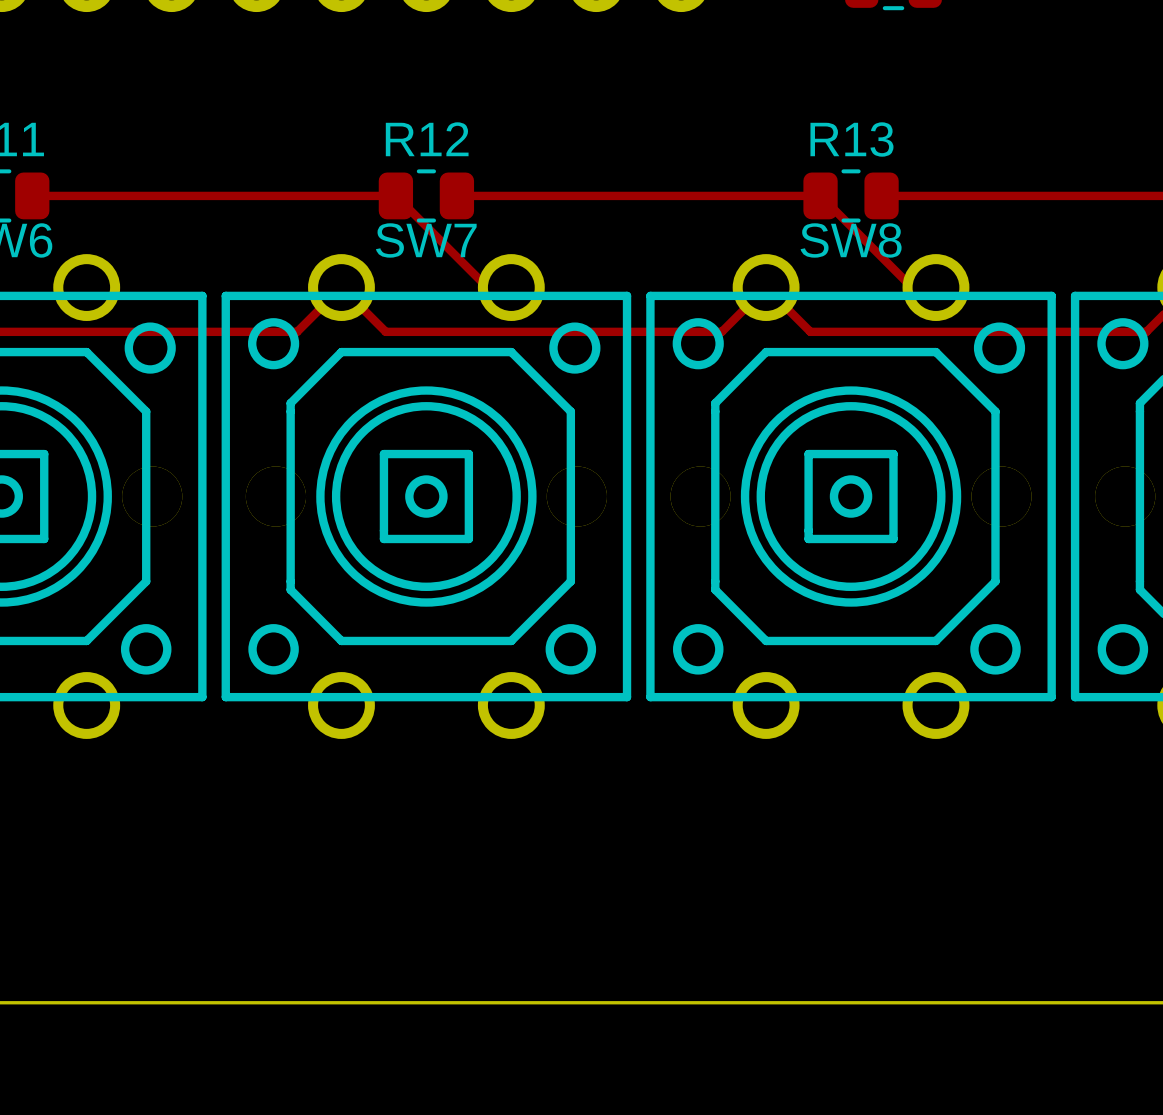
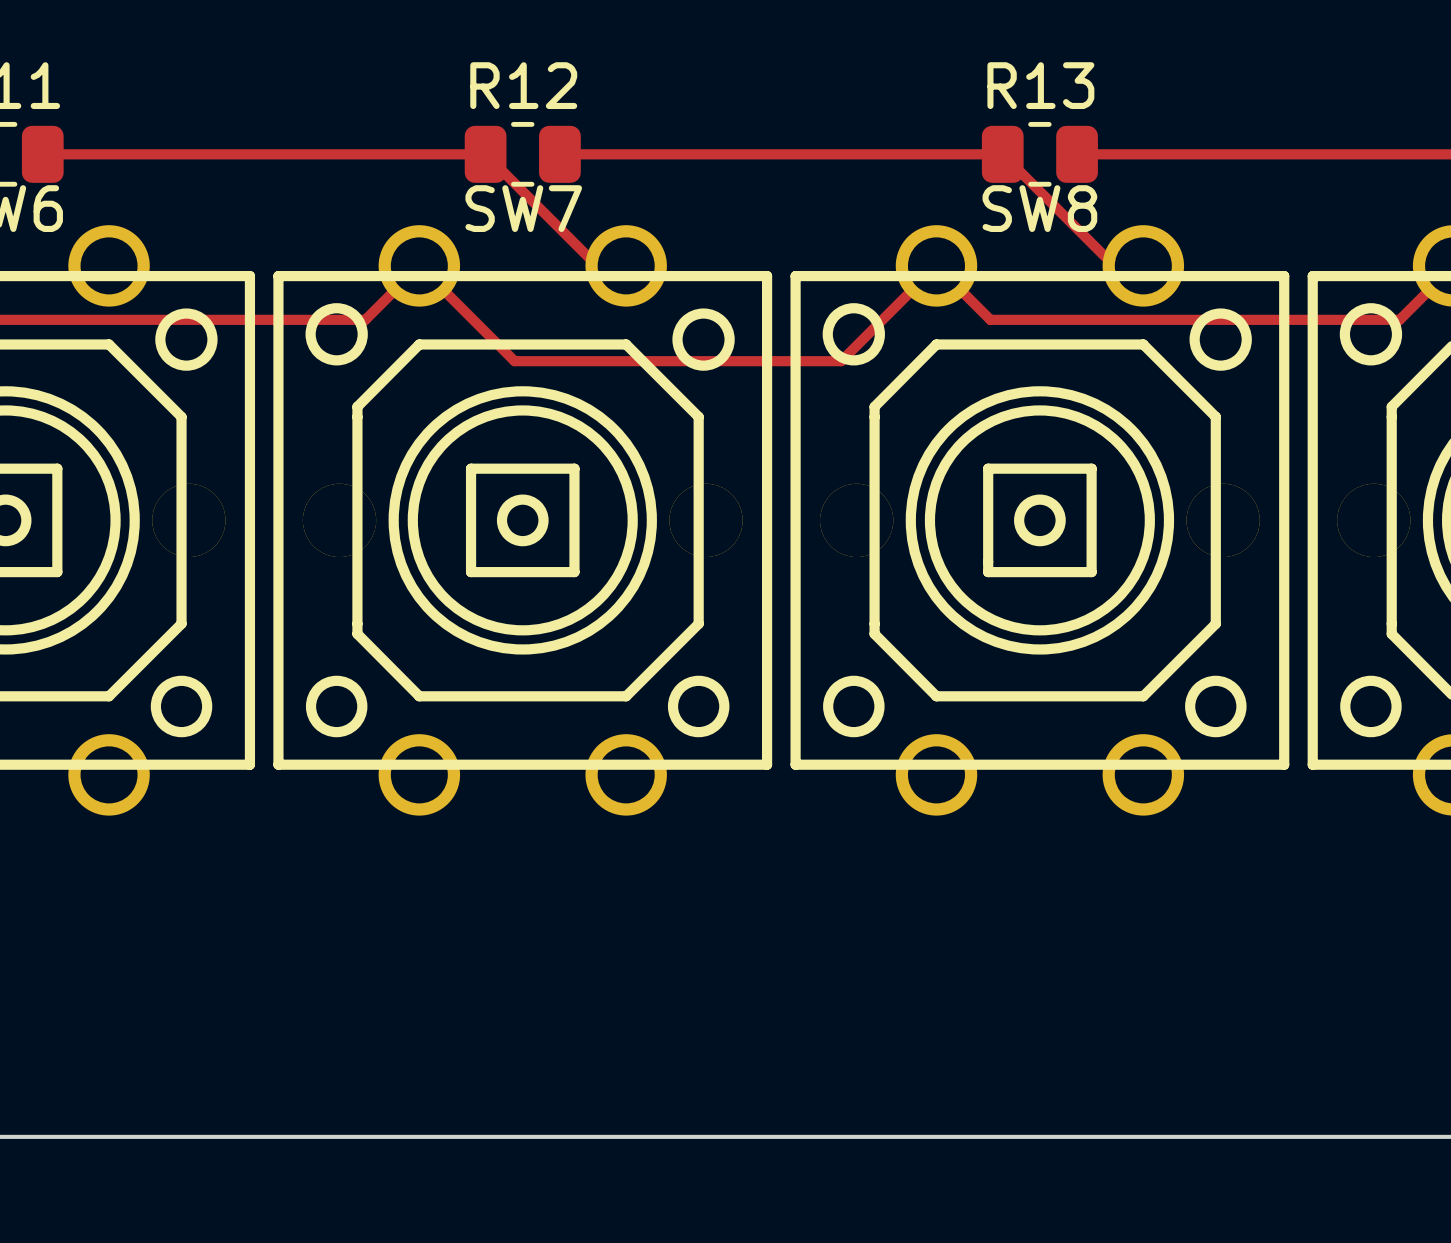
top track: (385, 331) (721, 331) -> (473, 319) (514, 361) (841, 361) (882, 319)

